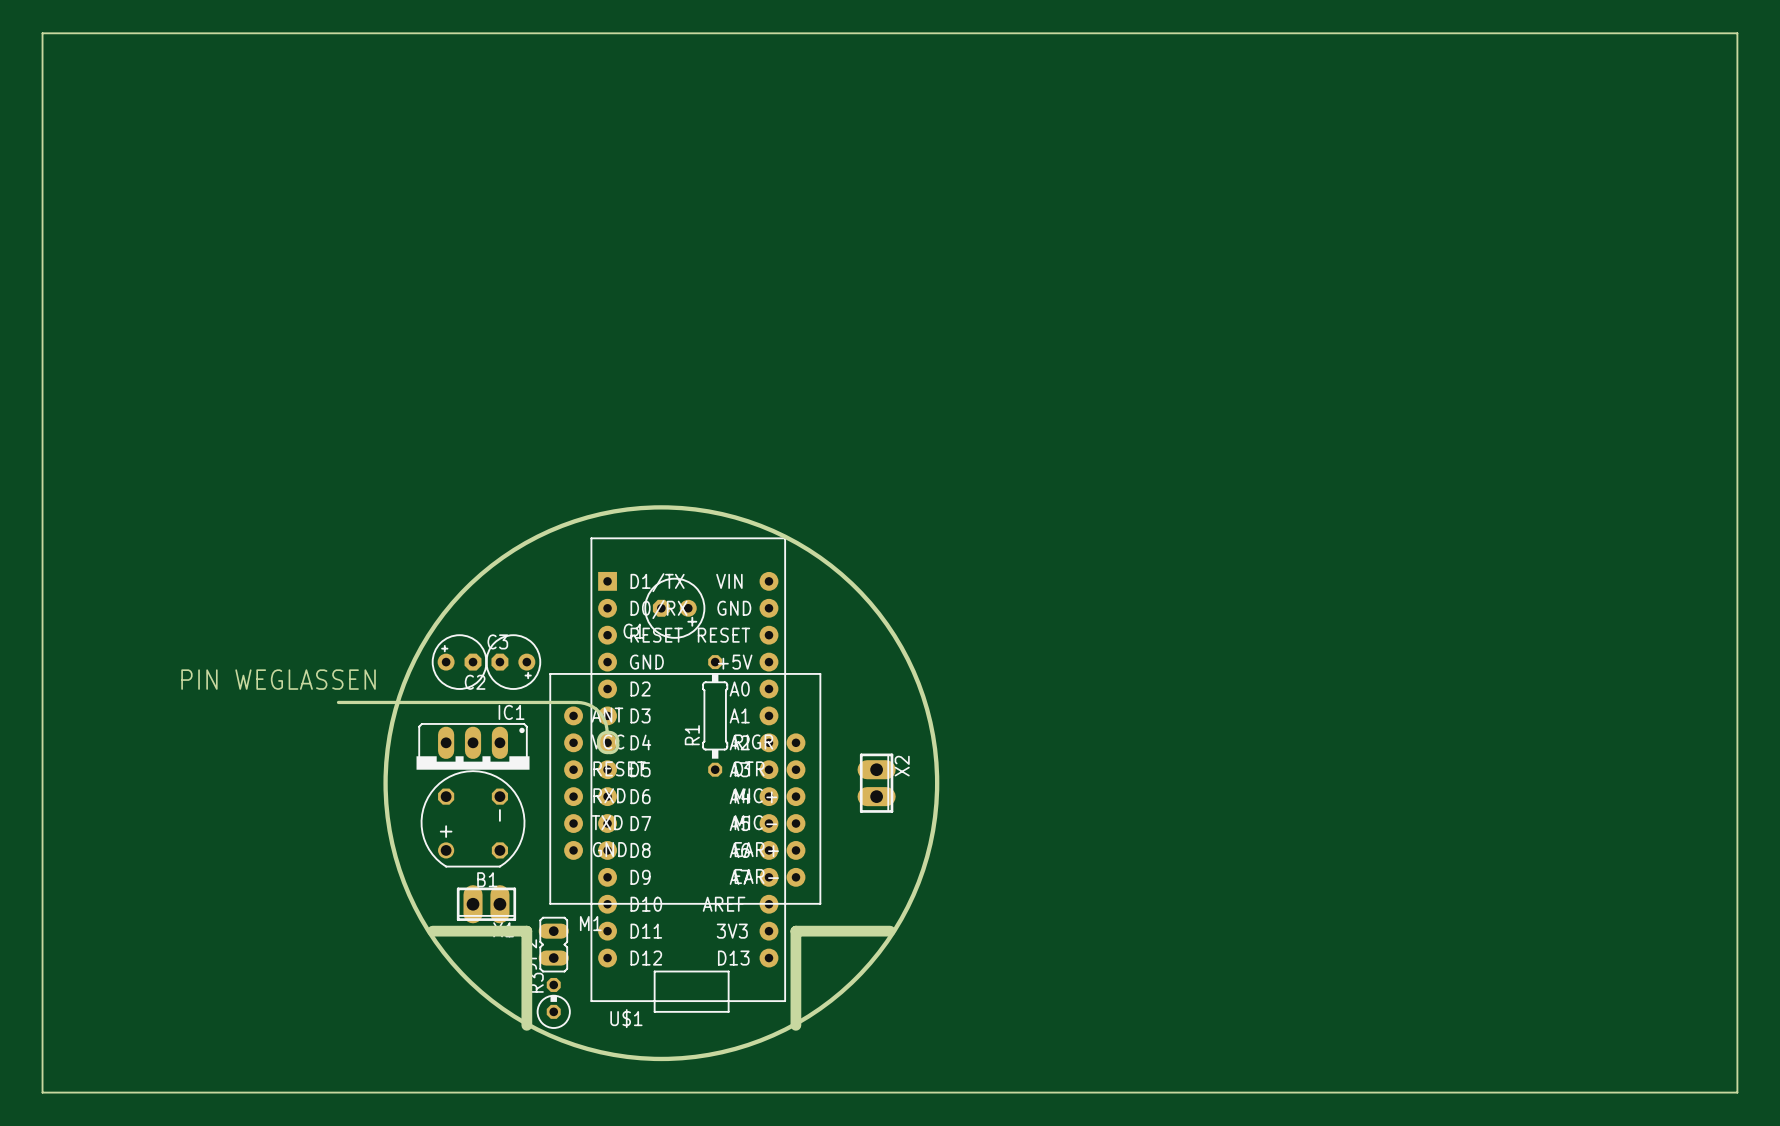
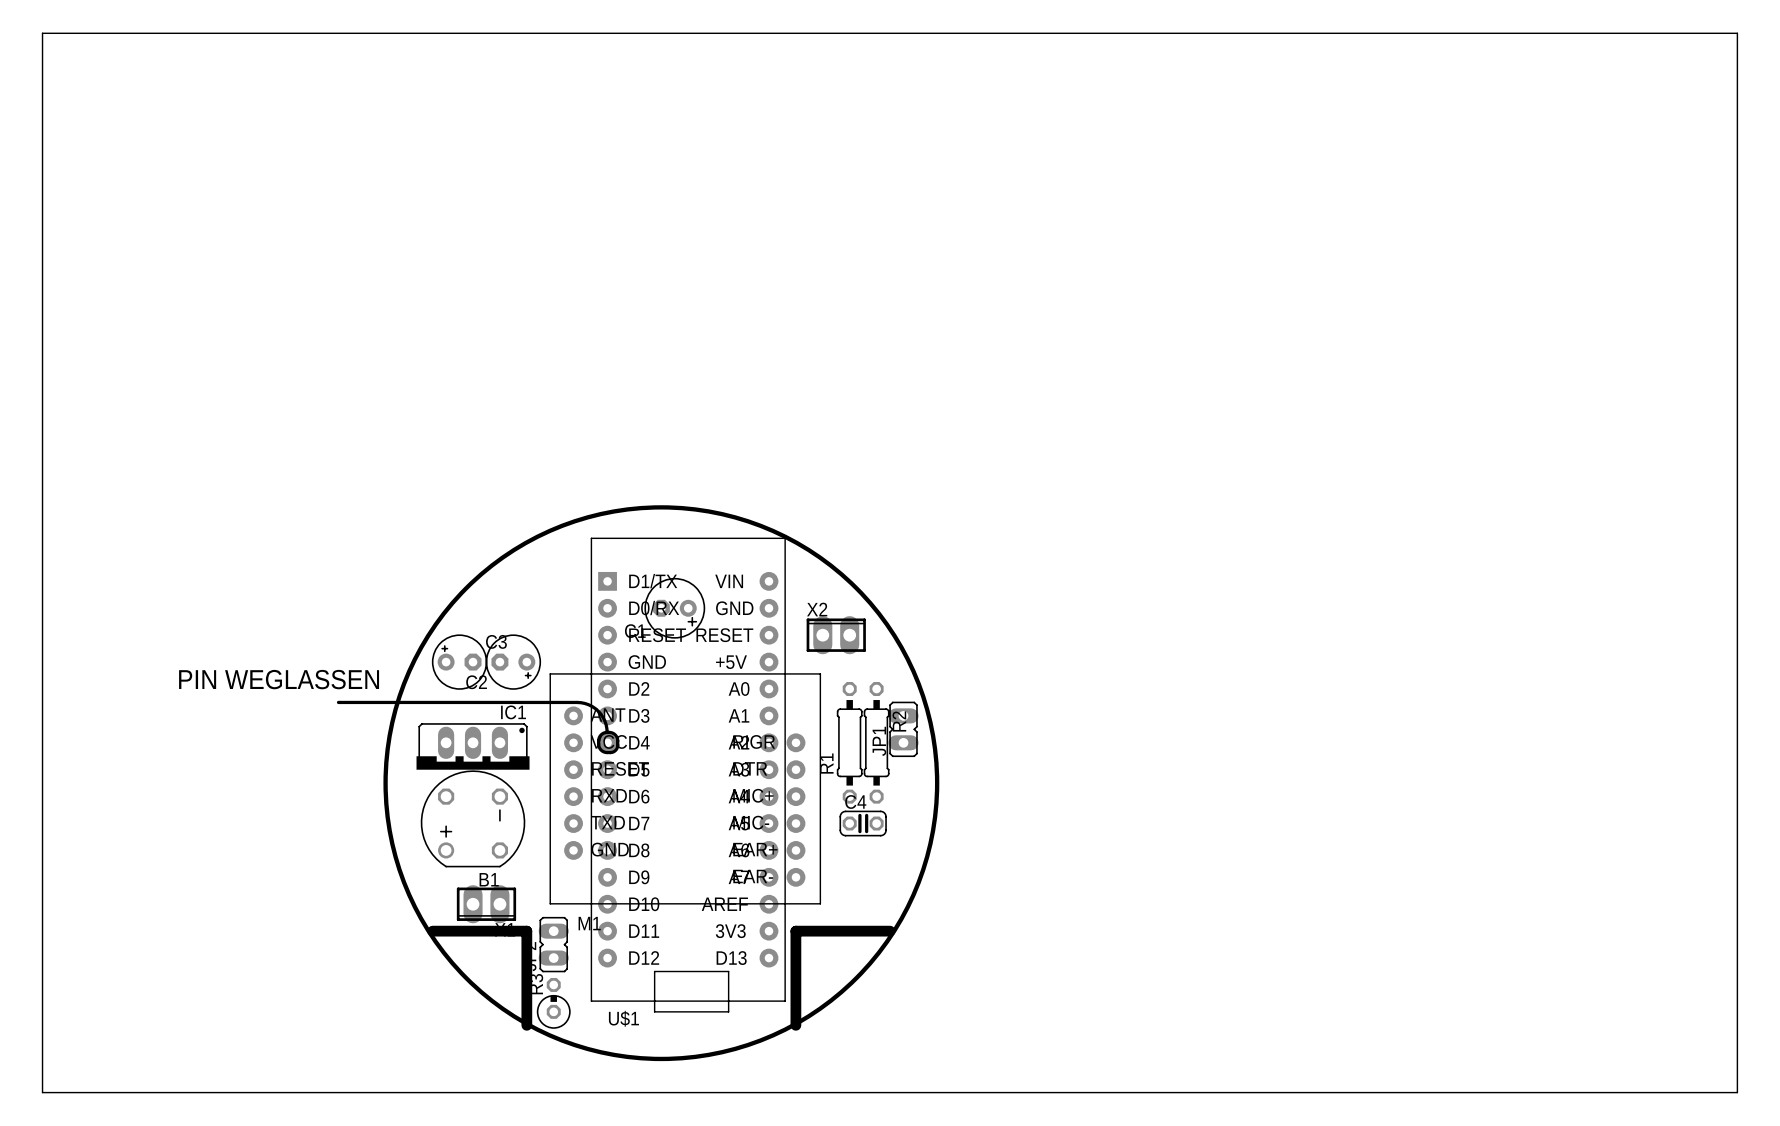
R1 position: (715, 715) -> (849, 742)
JP1: none -> (903, 729)
R2: none -> (876, 742)
X2 rotation: 0° (876, 783) -> 90° counterclockwise (836, 635)
X2 position: (876, 783) -> (836, 635)
C4: none -> (863, 823)

